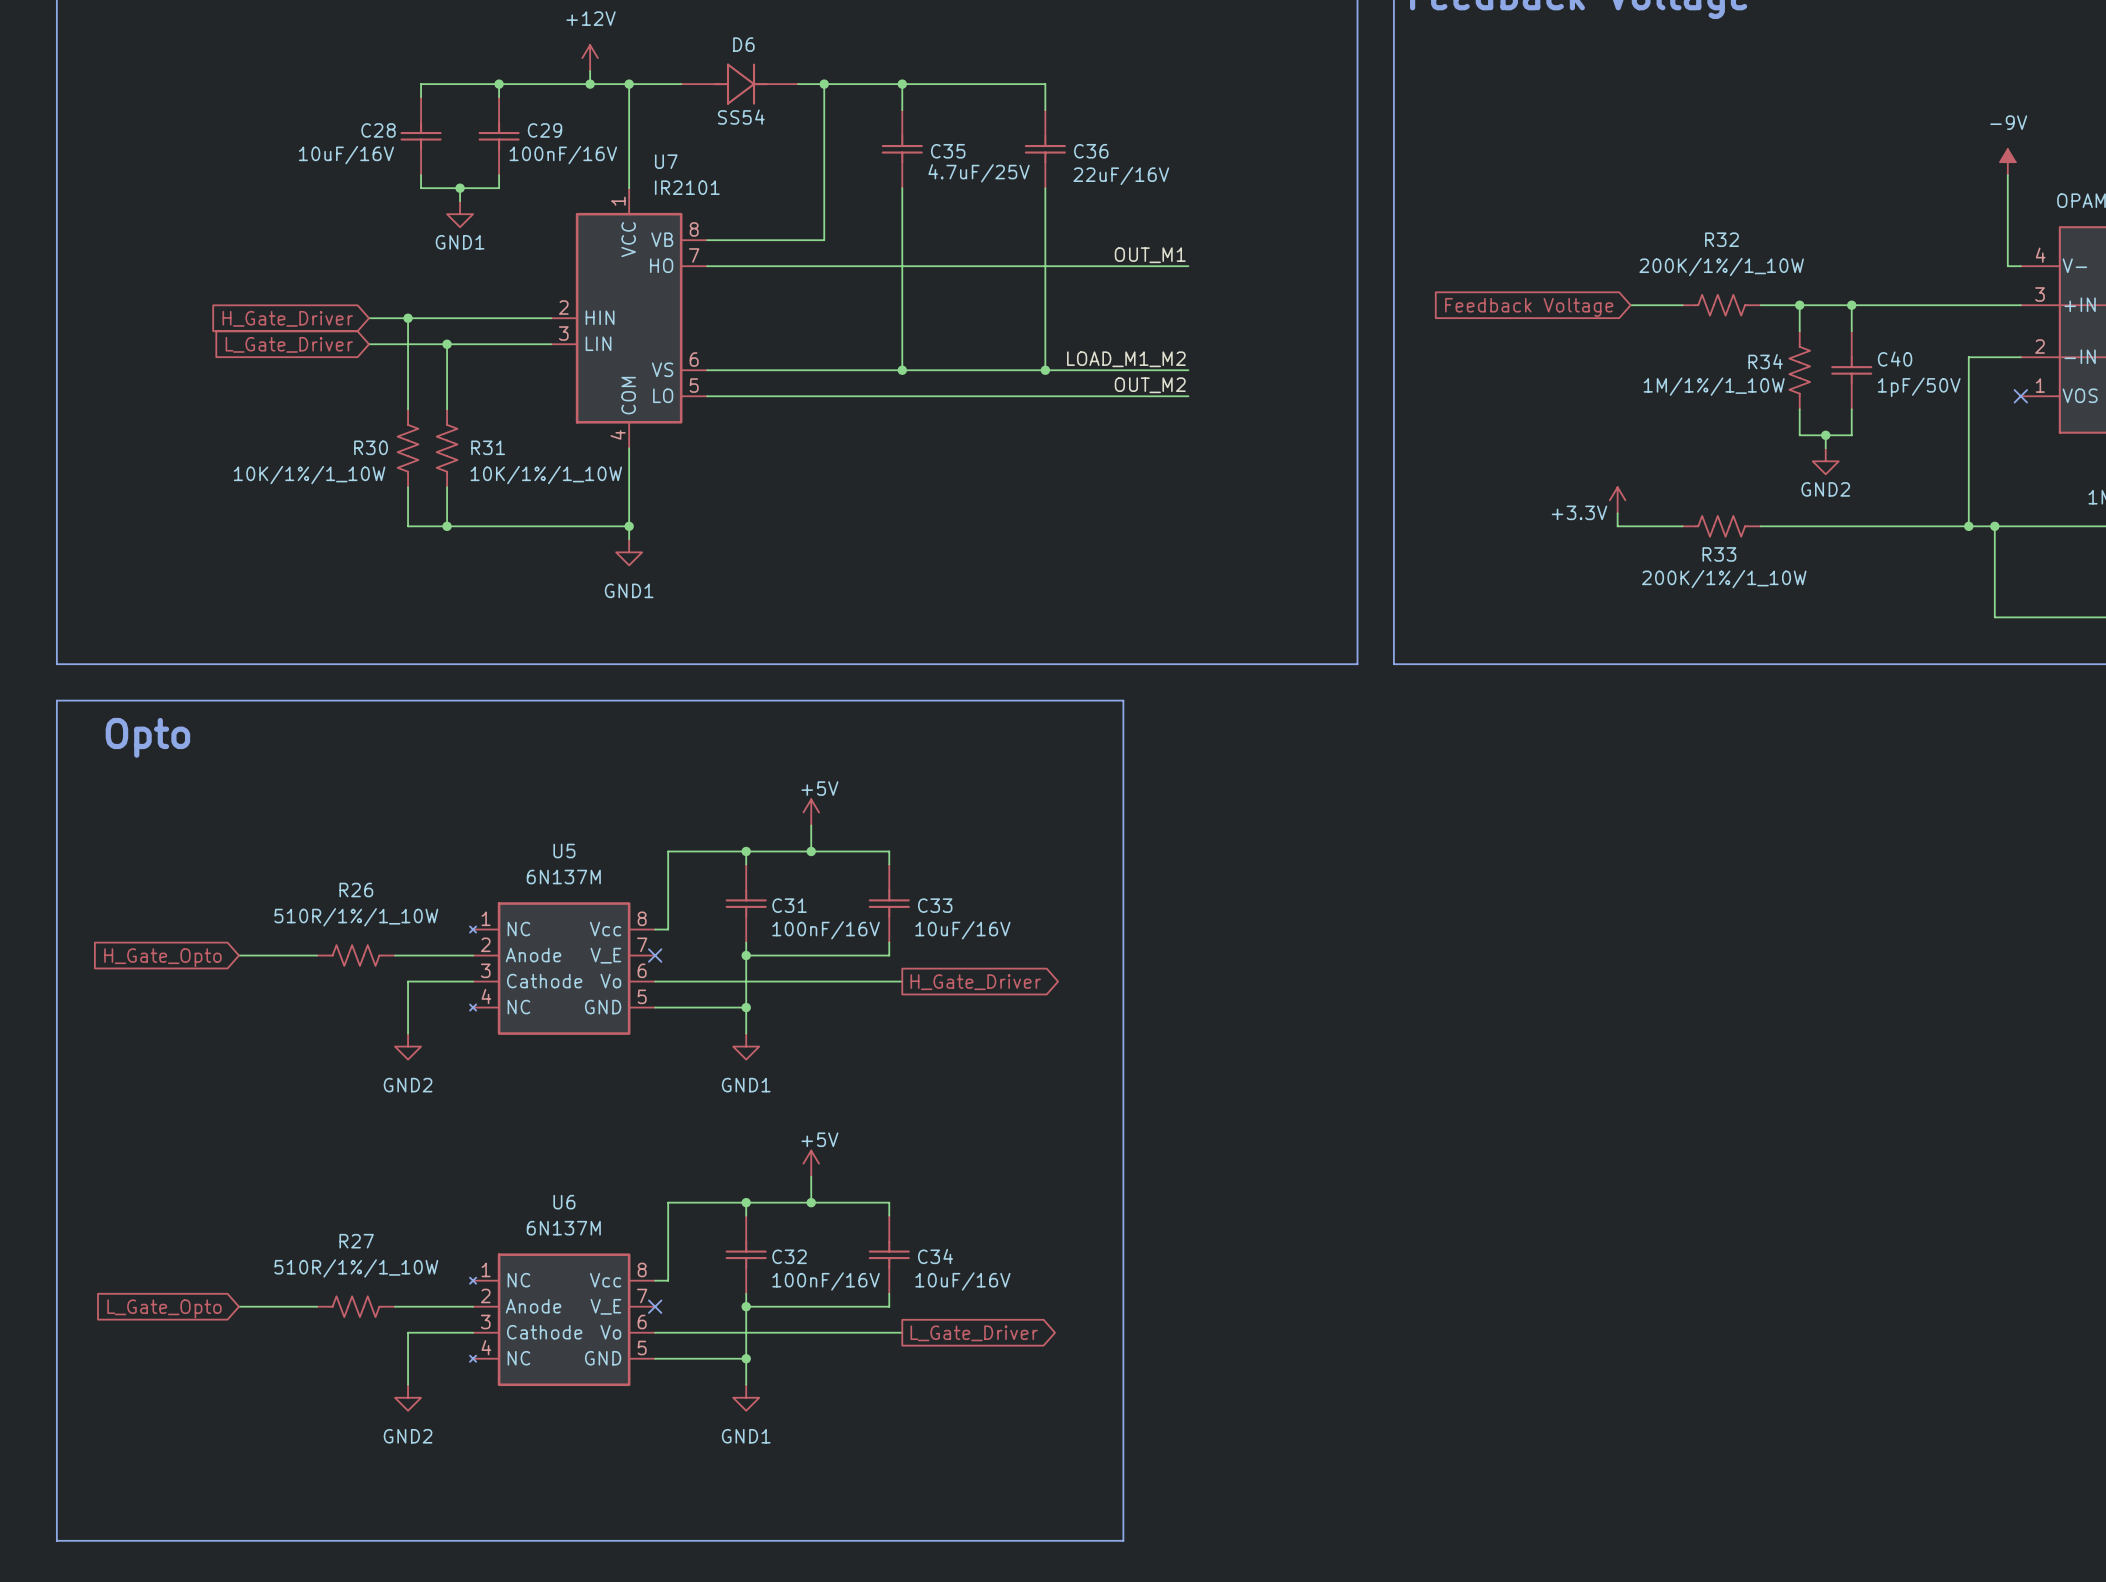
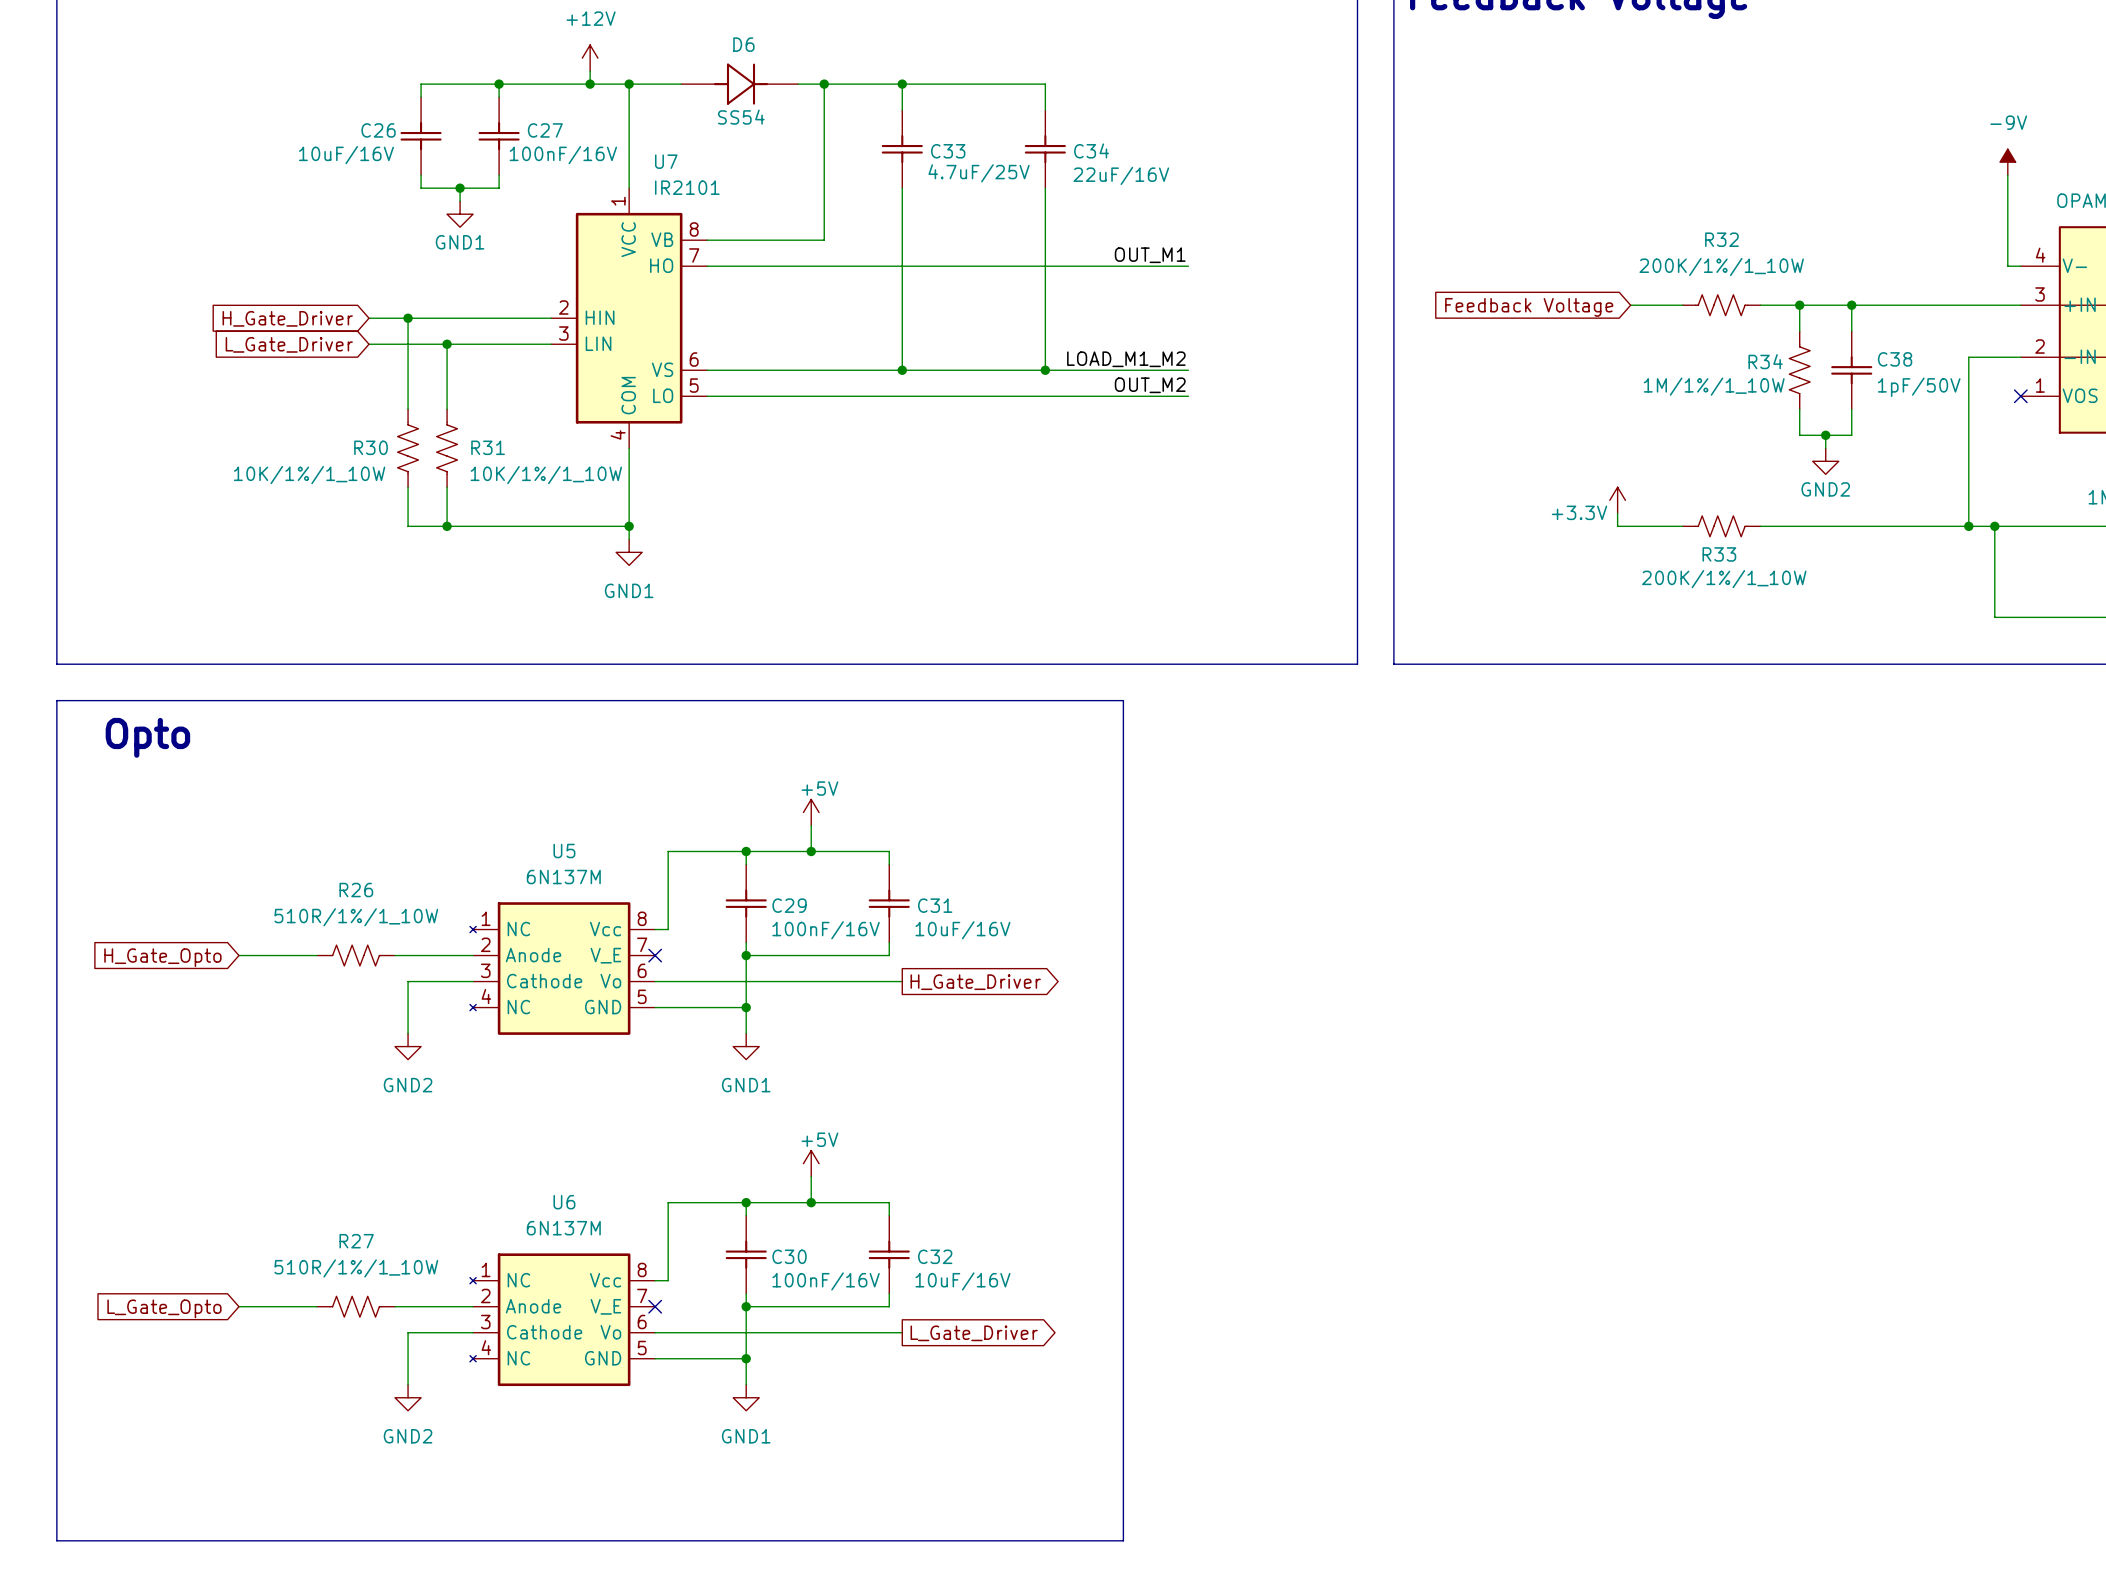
C28 name: C28 (378, 130) -> C26 (378, 130)
C29 name: C29 (545, 130) -> C27 (545, 130)
C35 name: C35 (948, 151) -> C33 (948, 151)
C36 name: C36 (1091, 151) -> C34 (1091, 150)
C40 name: C40 (1895, 359) -> C38 (1895, 359)
C31 name: C31 (789, 905) -> C29 (789, 905)
C33 name: C33 (935, 905) -> C31 (935, 905)
C32 name: C32 (789, 1256) -> C30 (789, 1256)
C34 name: C34 (935, 1256) -> C32 (935, 1256)

